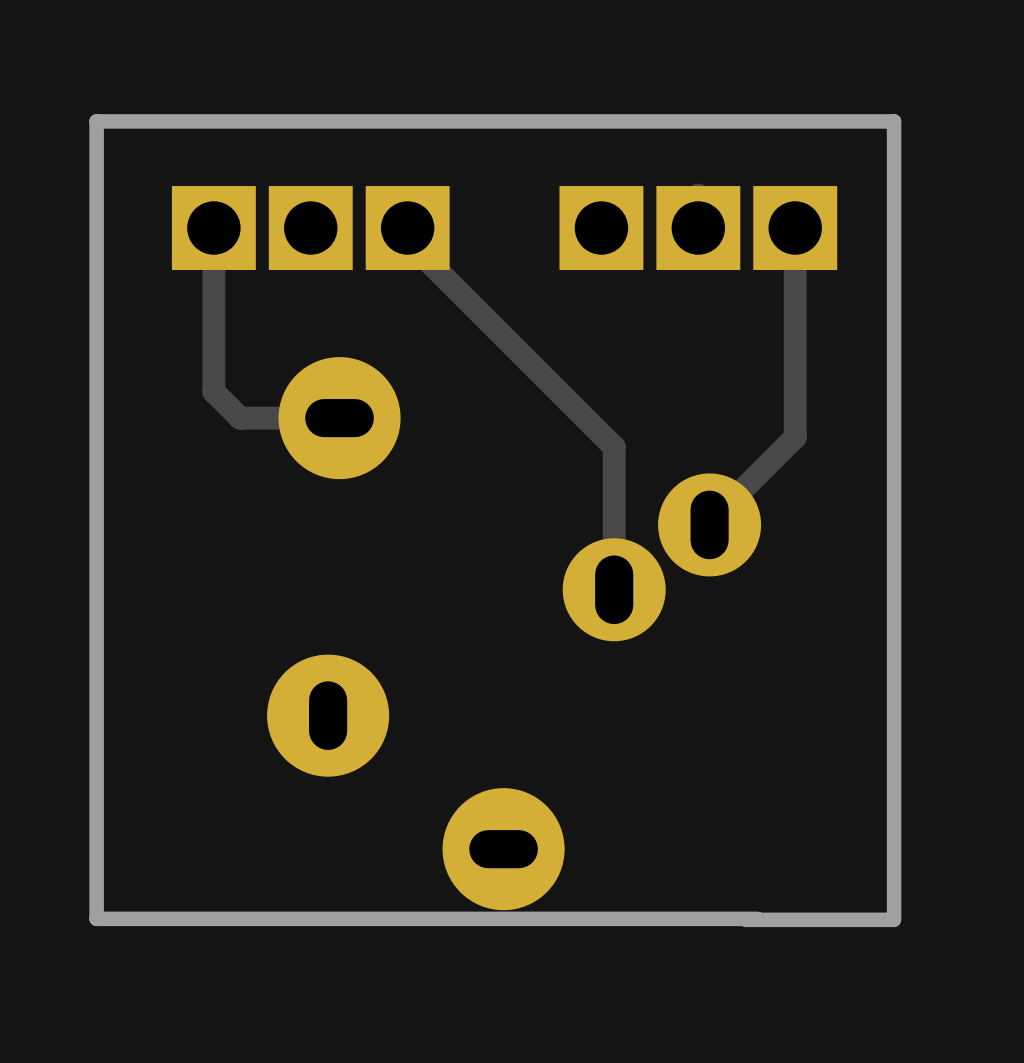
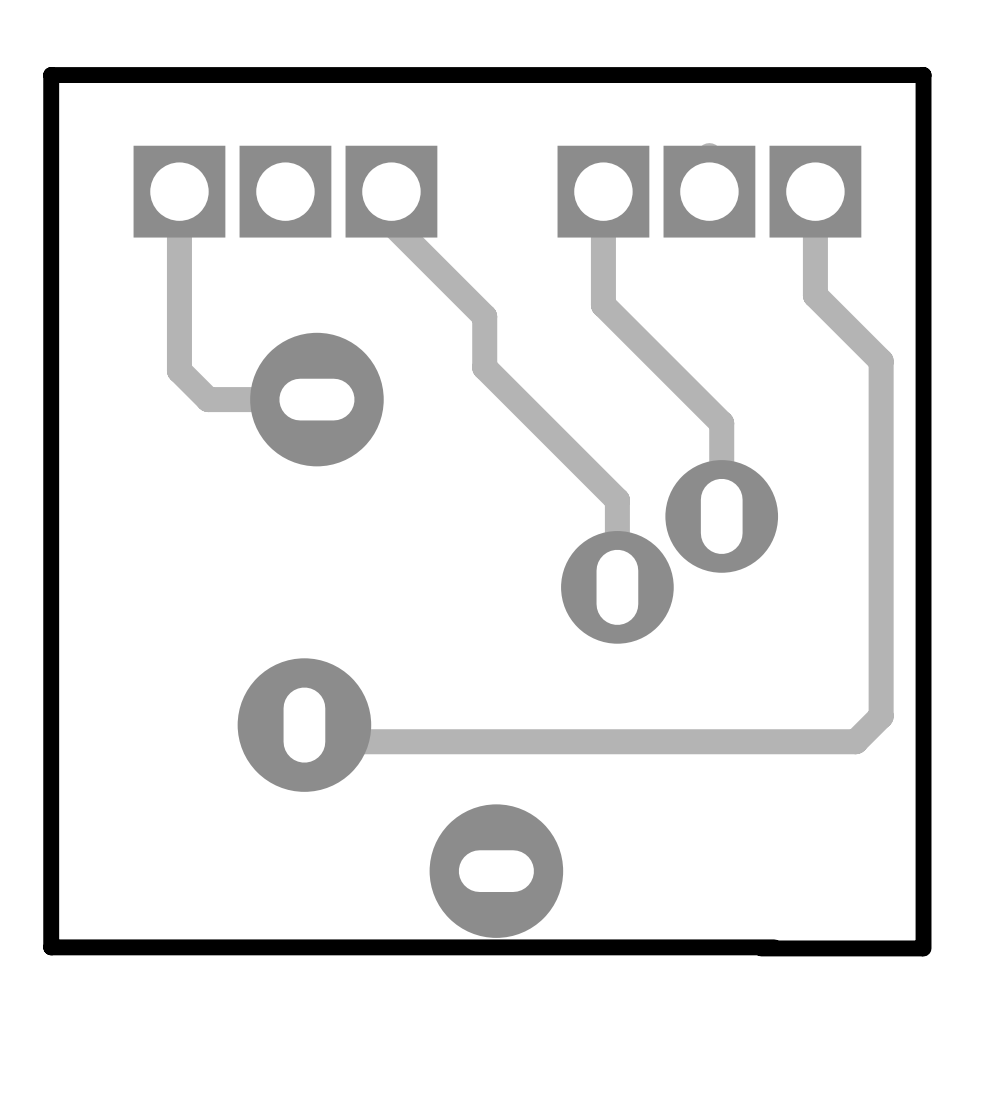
track: (407, 240) (614, 447) (614, 510) -> (391, 205) (391, 223) (484, 316) (484, 367) (617, 500)
track: (795, 322) (795, 437) (709, 522) -> (603, 191) (603, 305) (721, 423) (721, 514)
track: none -> (815, 295) (881, 361) (881, 716) (855, 741) (321, 741) (304, 725)

